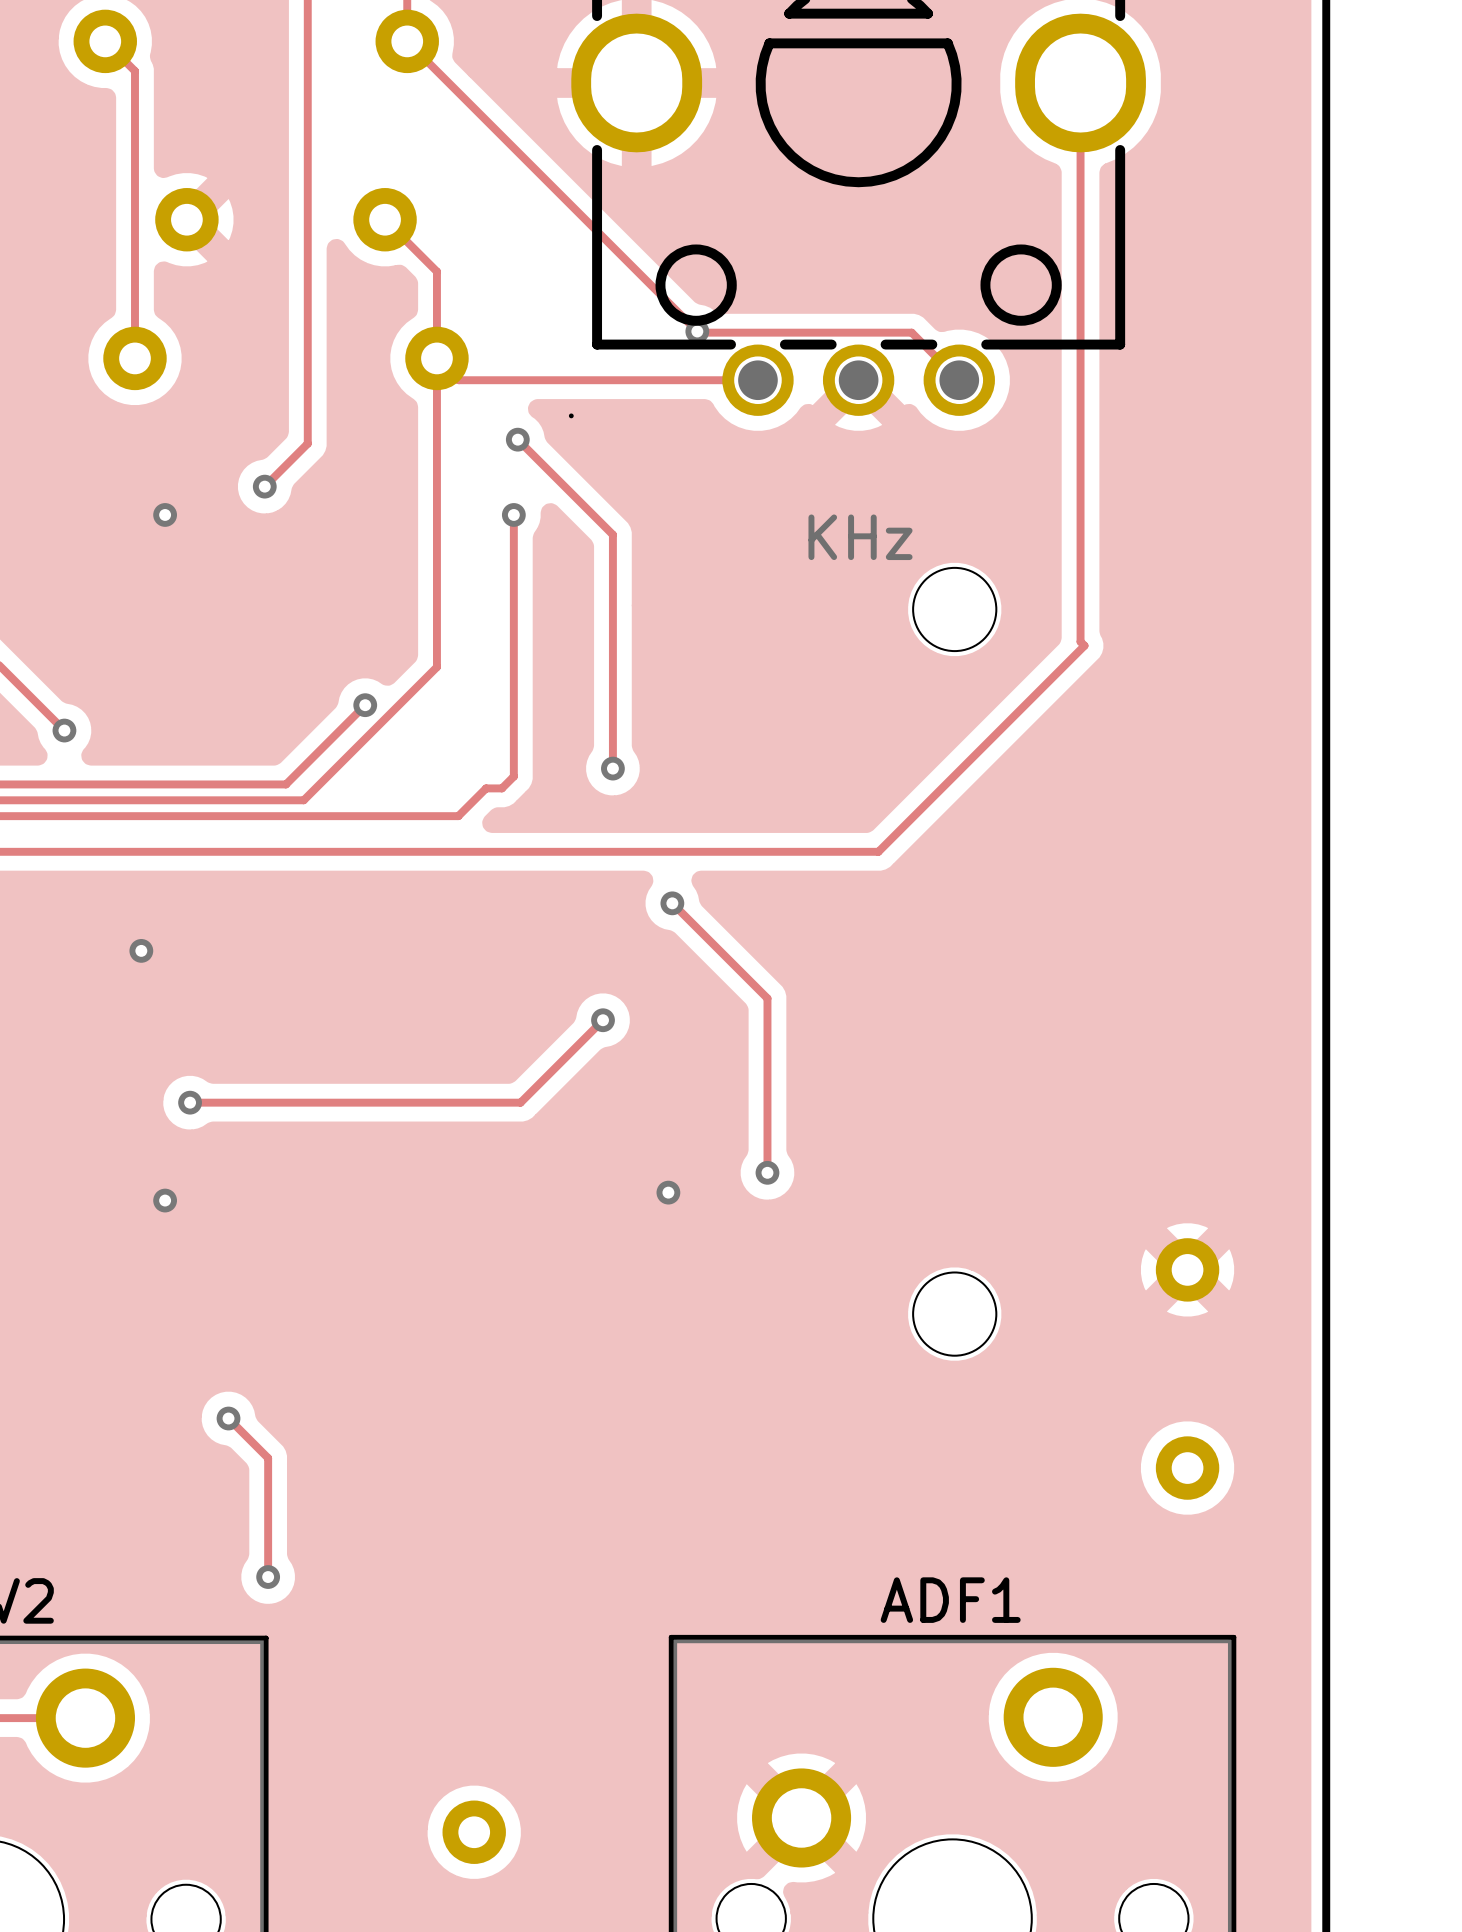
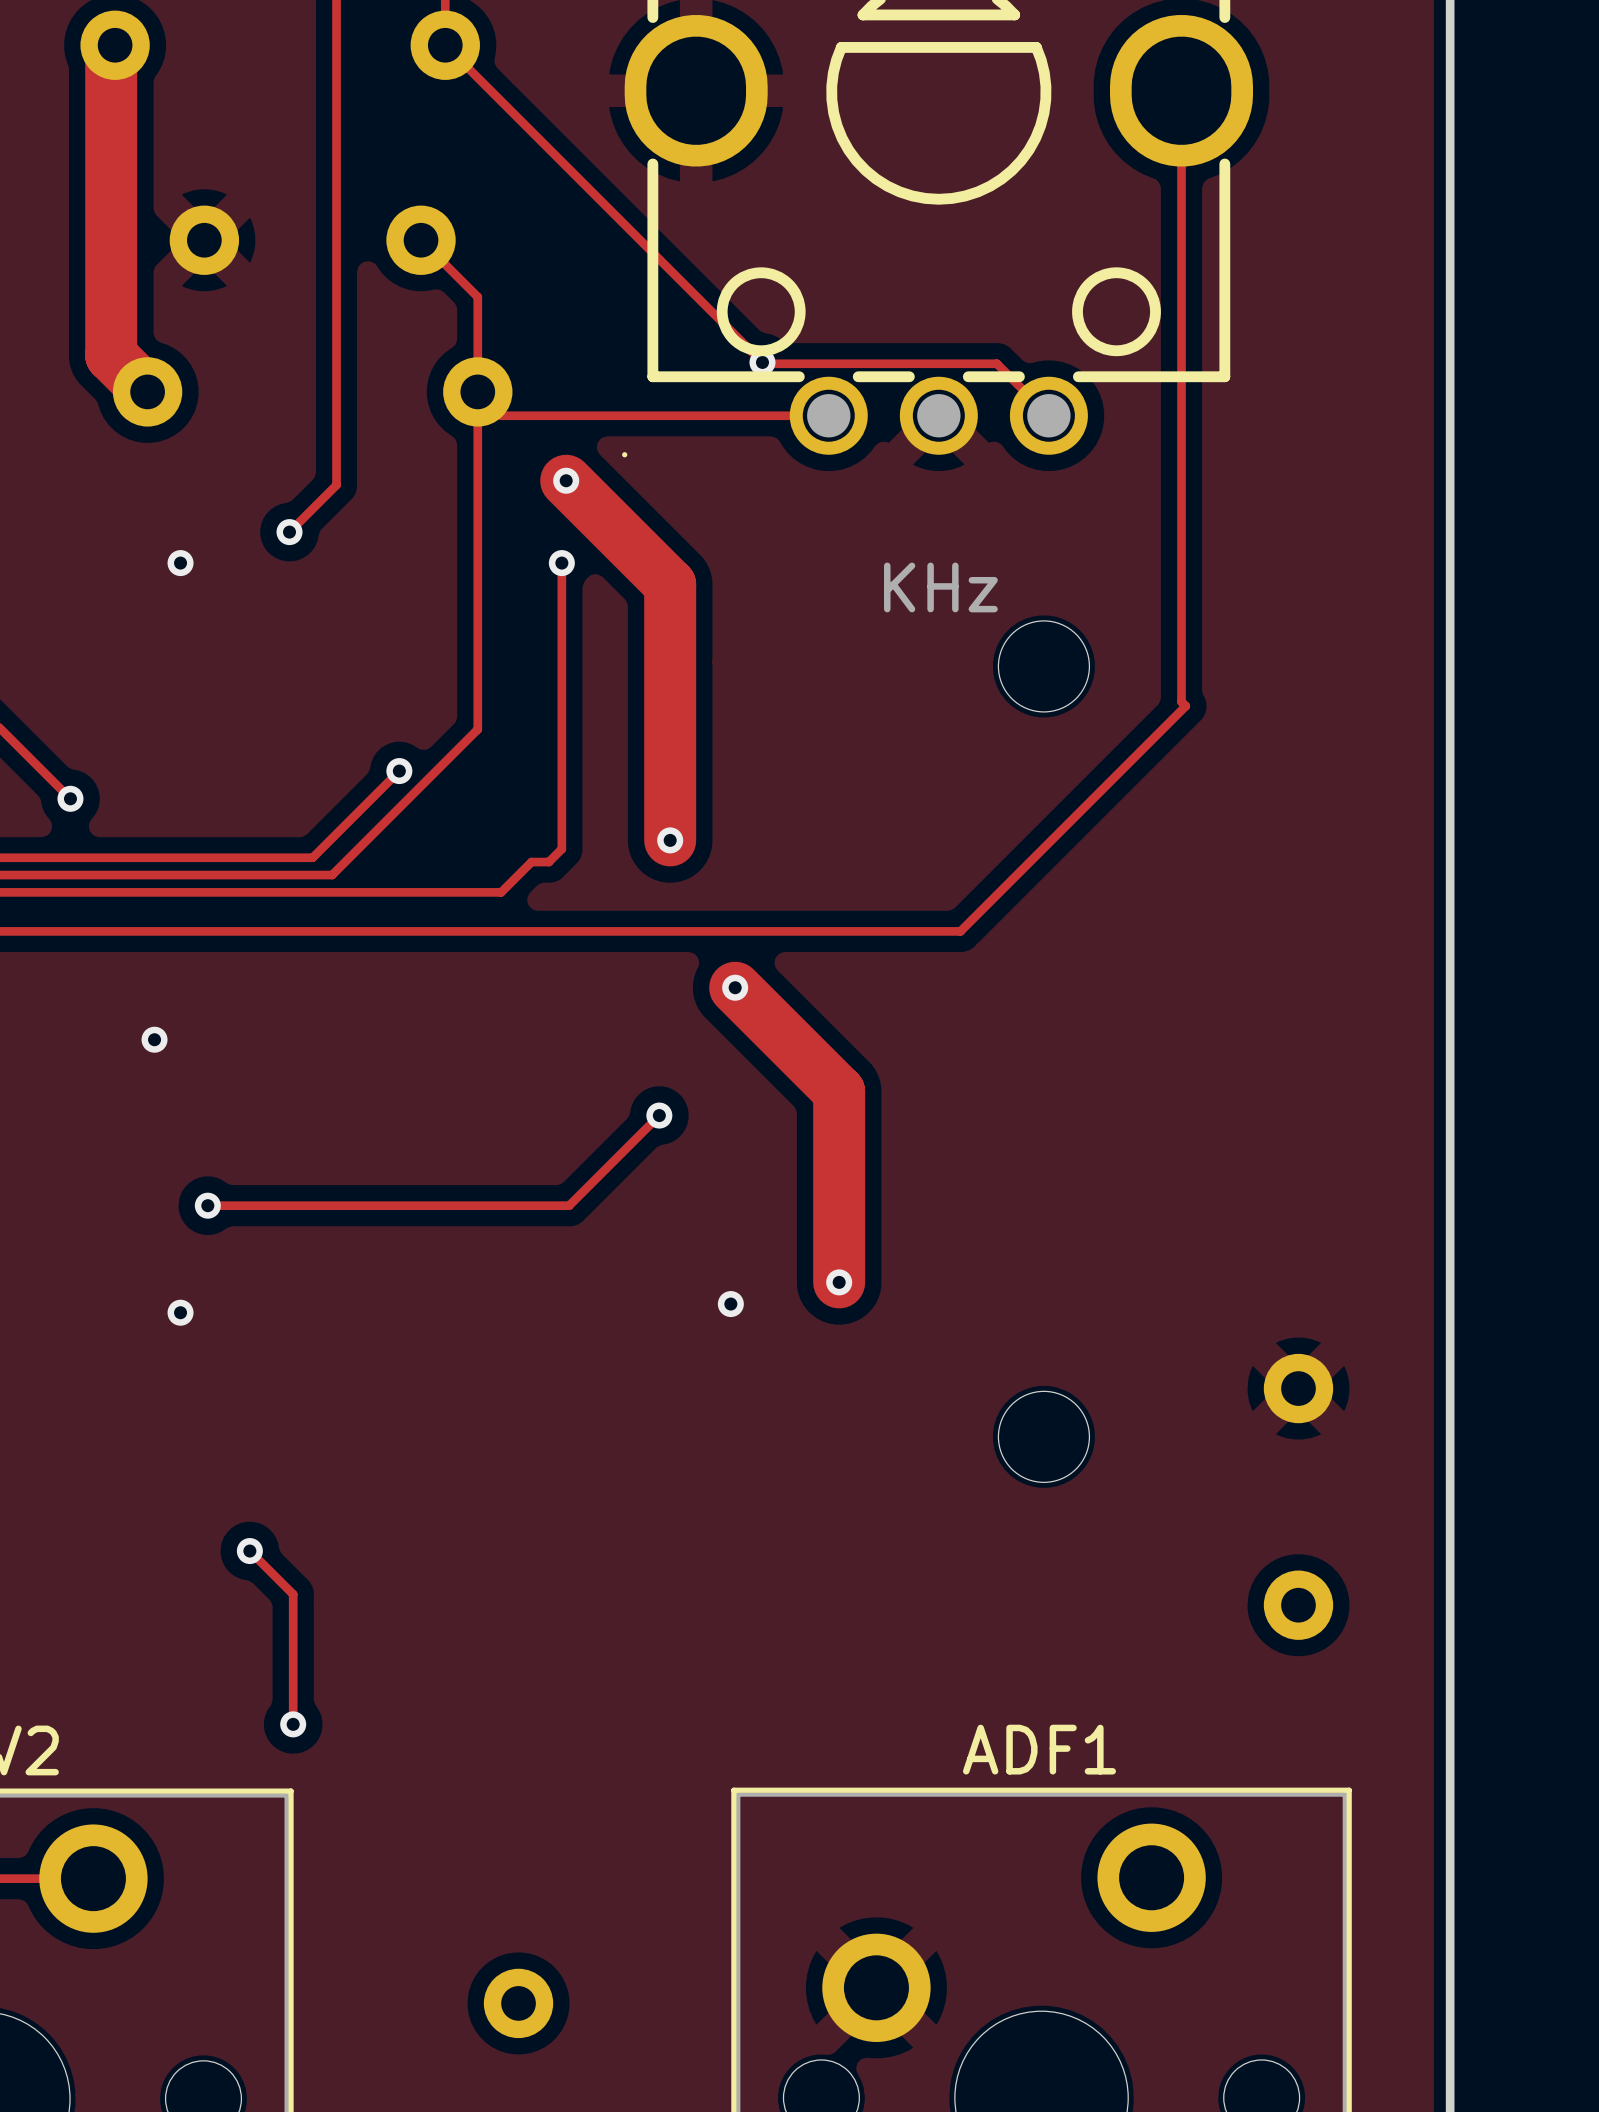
track: (105, 41) (134, 71) (134, 358) -> (115, 45) (111, 49) (111, 355) (147, 391)
track width: thin (517, 439) (612, 534) (612, 768) -> thick (566, 480) (670, 584) (670, 840)
track width: thin (672, 903) (767, 998) (767, 1172) -> thick (735, 987) (839, 1091) (839, 1282)

